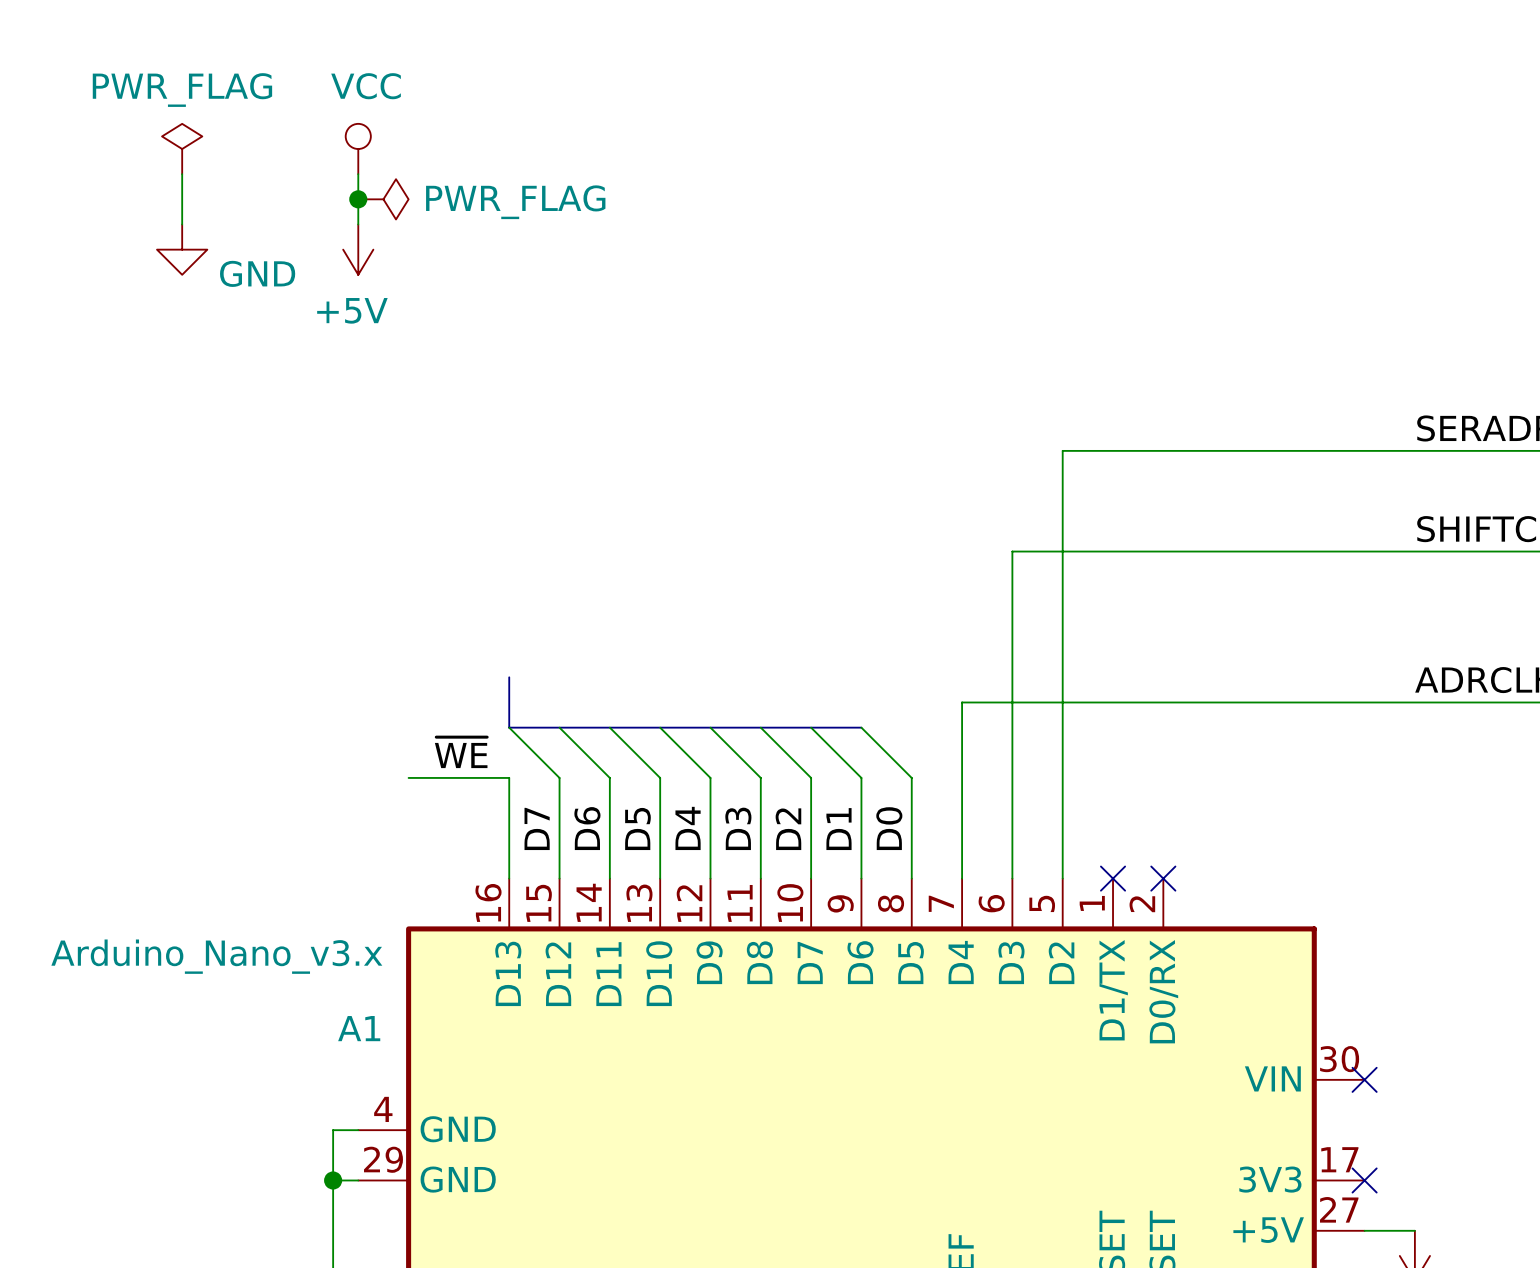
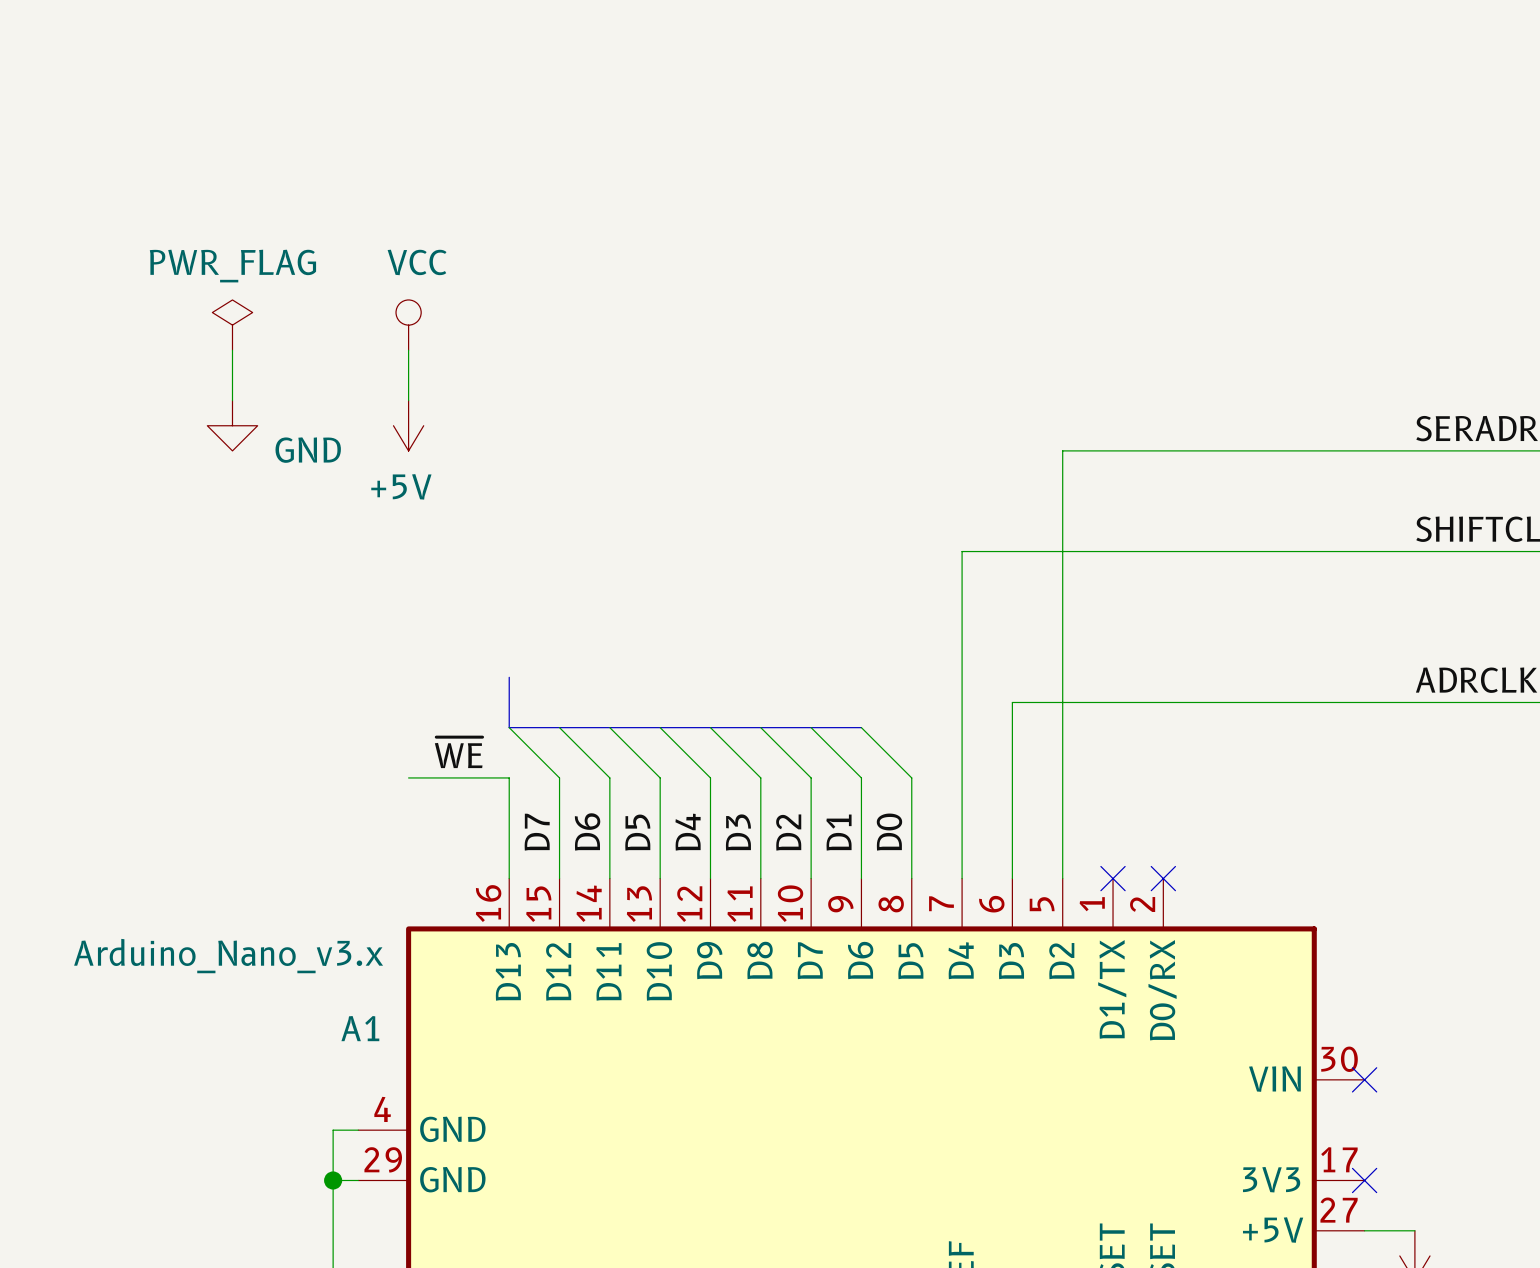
power symbol: PWR_FLAG (182, 149) -> none
power symbol position: VCC (358, 149) -> VCC (408, 325)
wire: (182, 174) (182, 224) -> (232, 350) (232, 400)
wire: (358, 174) (358, 224) -> (408, 350) (408, 400)
junction: (358, 199) -> none
power symbol: PWR_FLAG (383, 199) -> none
power symbol position: GND (182, 249) -> GND (232, 425)
power symbol position: +5V (358, 249) -> +5V (408, 425)
power symbol: none -> PWR_FLAG (232, 325)
wire: (1012, 551) (1012, 702) (962, 702) -> (1012, 551) (962, 551) (962, 702)

